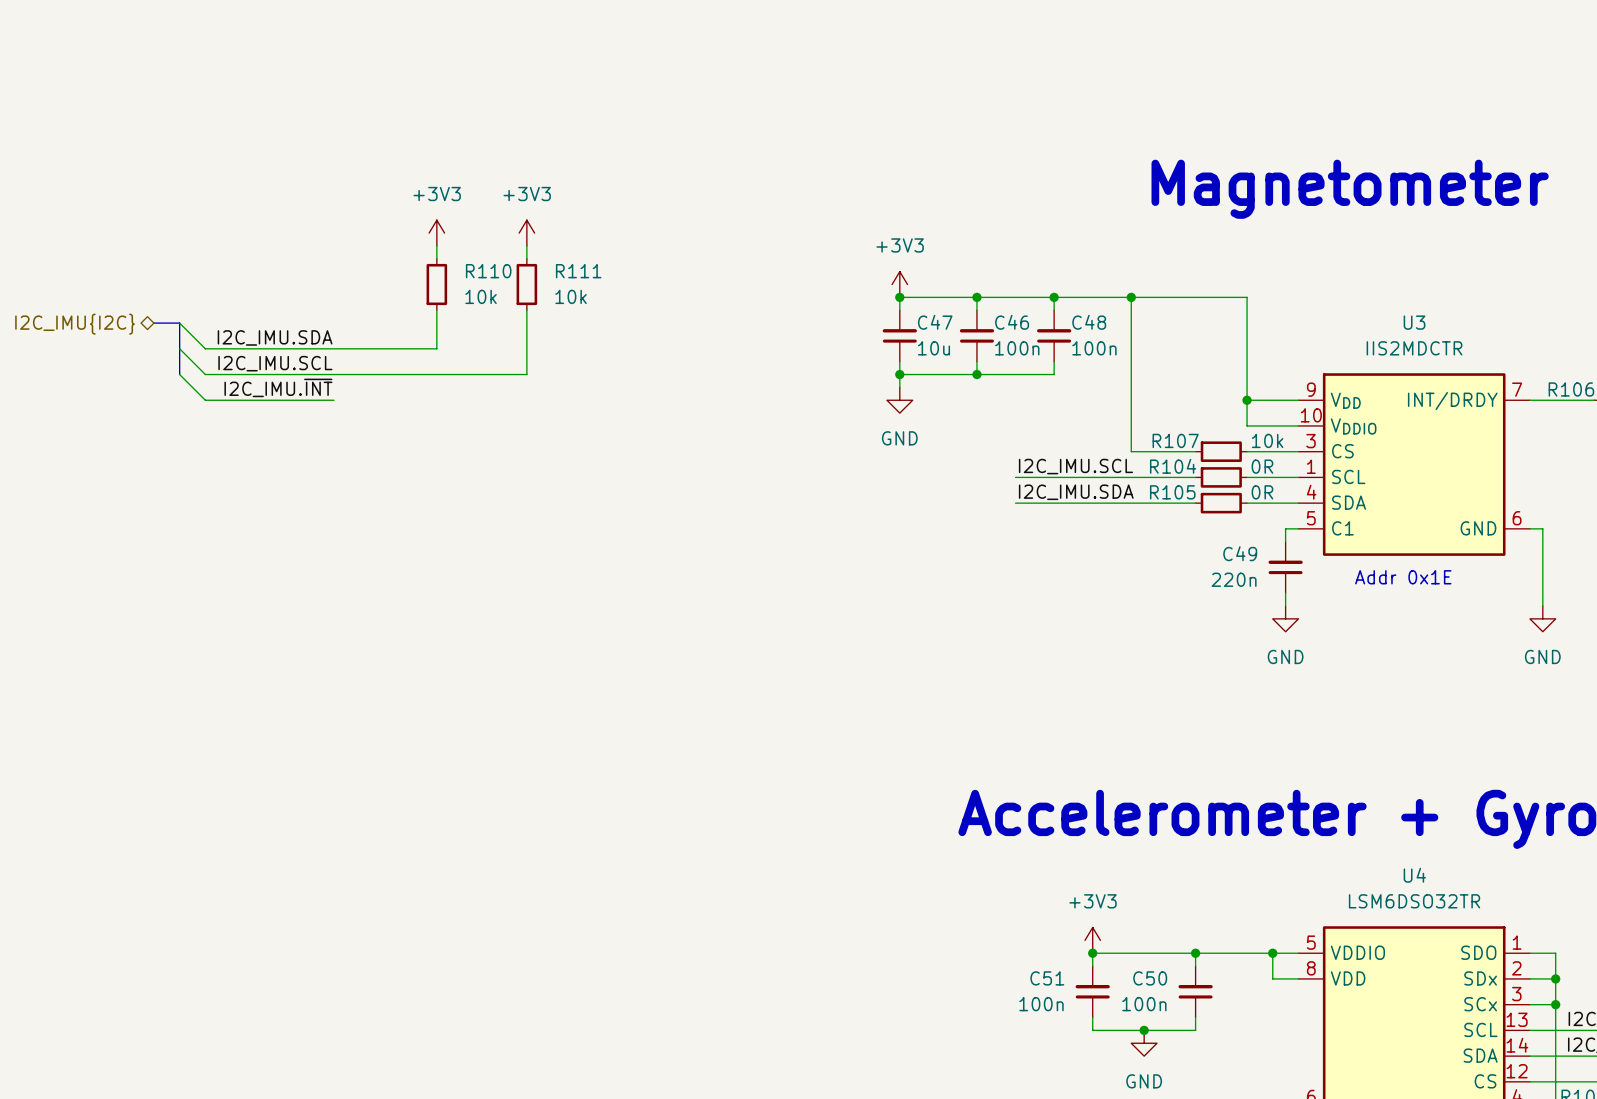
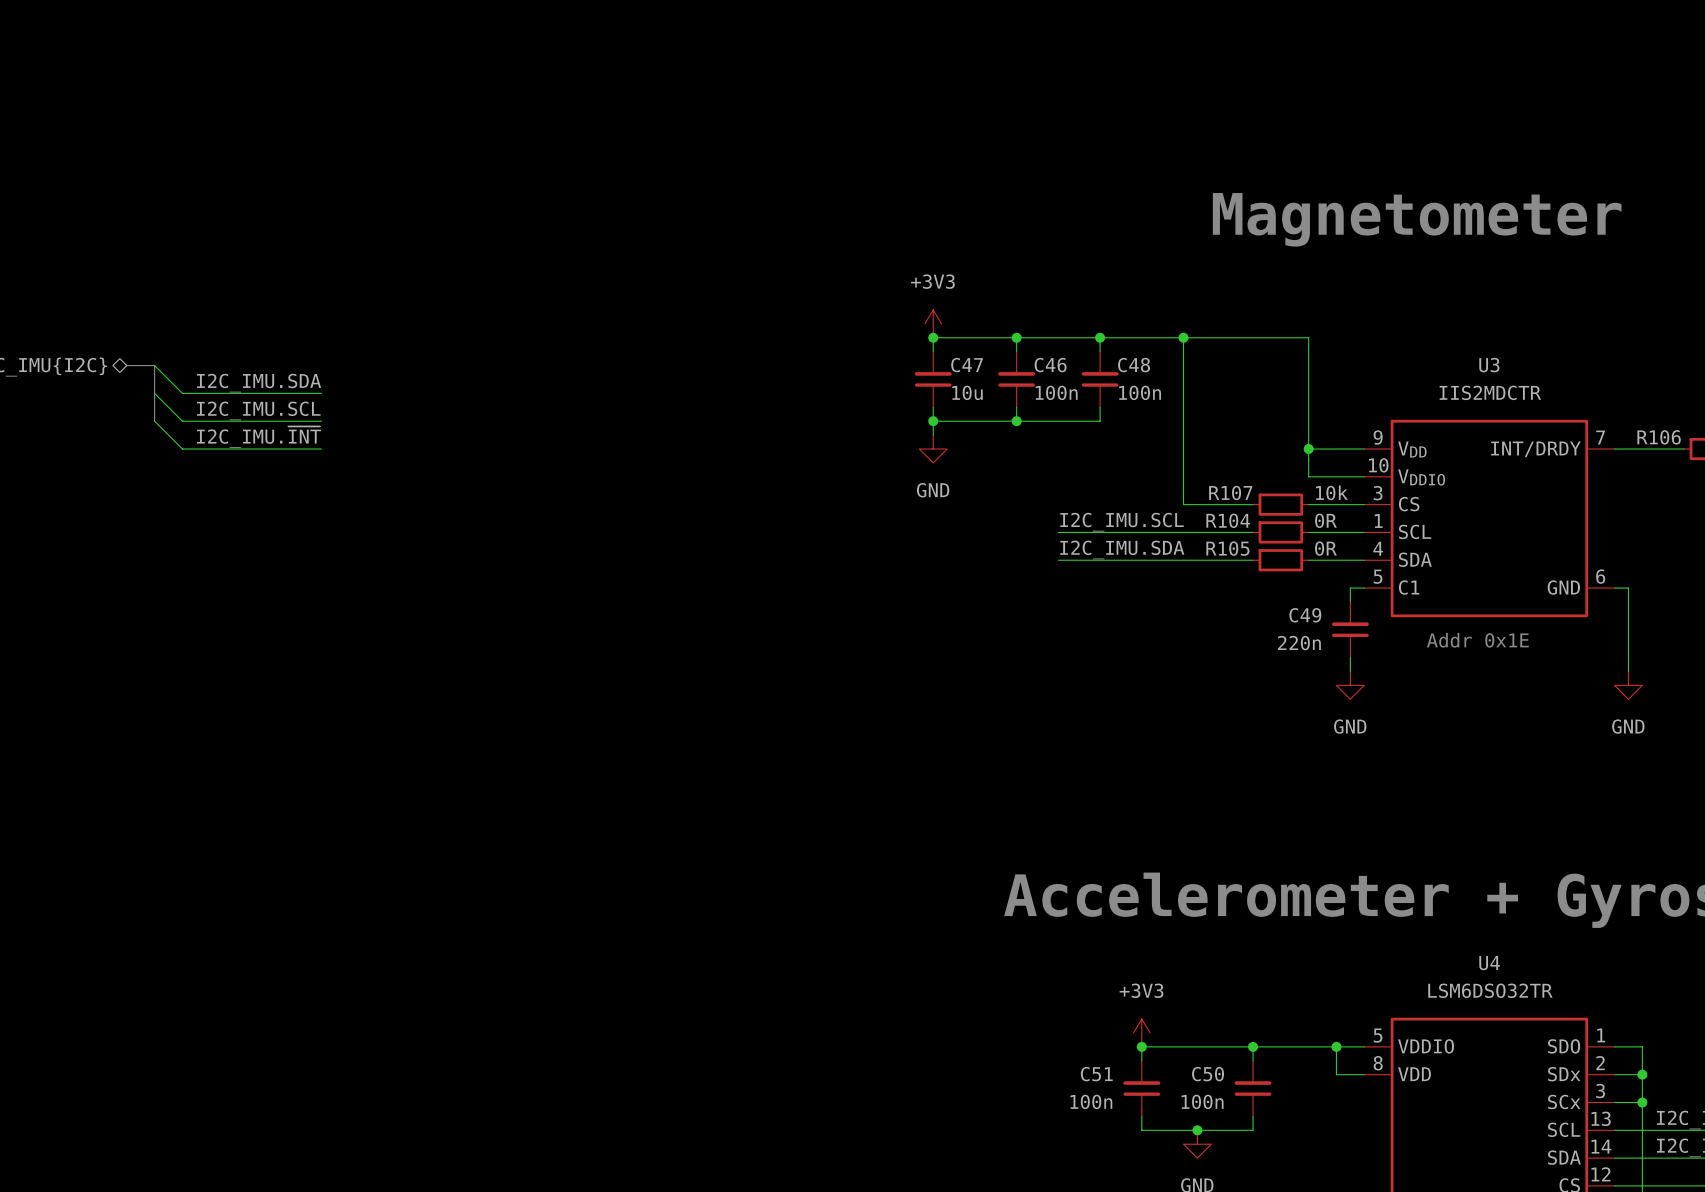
power symbol: +3V3 (436, 233) -> none
power symbol: +3V3 (526, 233) -> none
wire: (436, 245) (436, 258) -> none
wire: (526, 245) (526, 258) -> none
R110: (436, 284) -> none
R111: (526, 284) -> none
wire: (436, 310) (436, 348) (333, 348) -> none
wire: (526, 310) (526, 374) (333, 374) -> none

